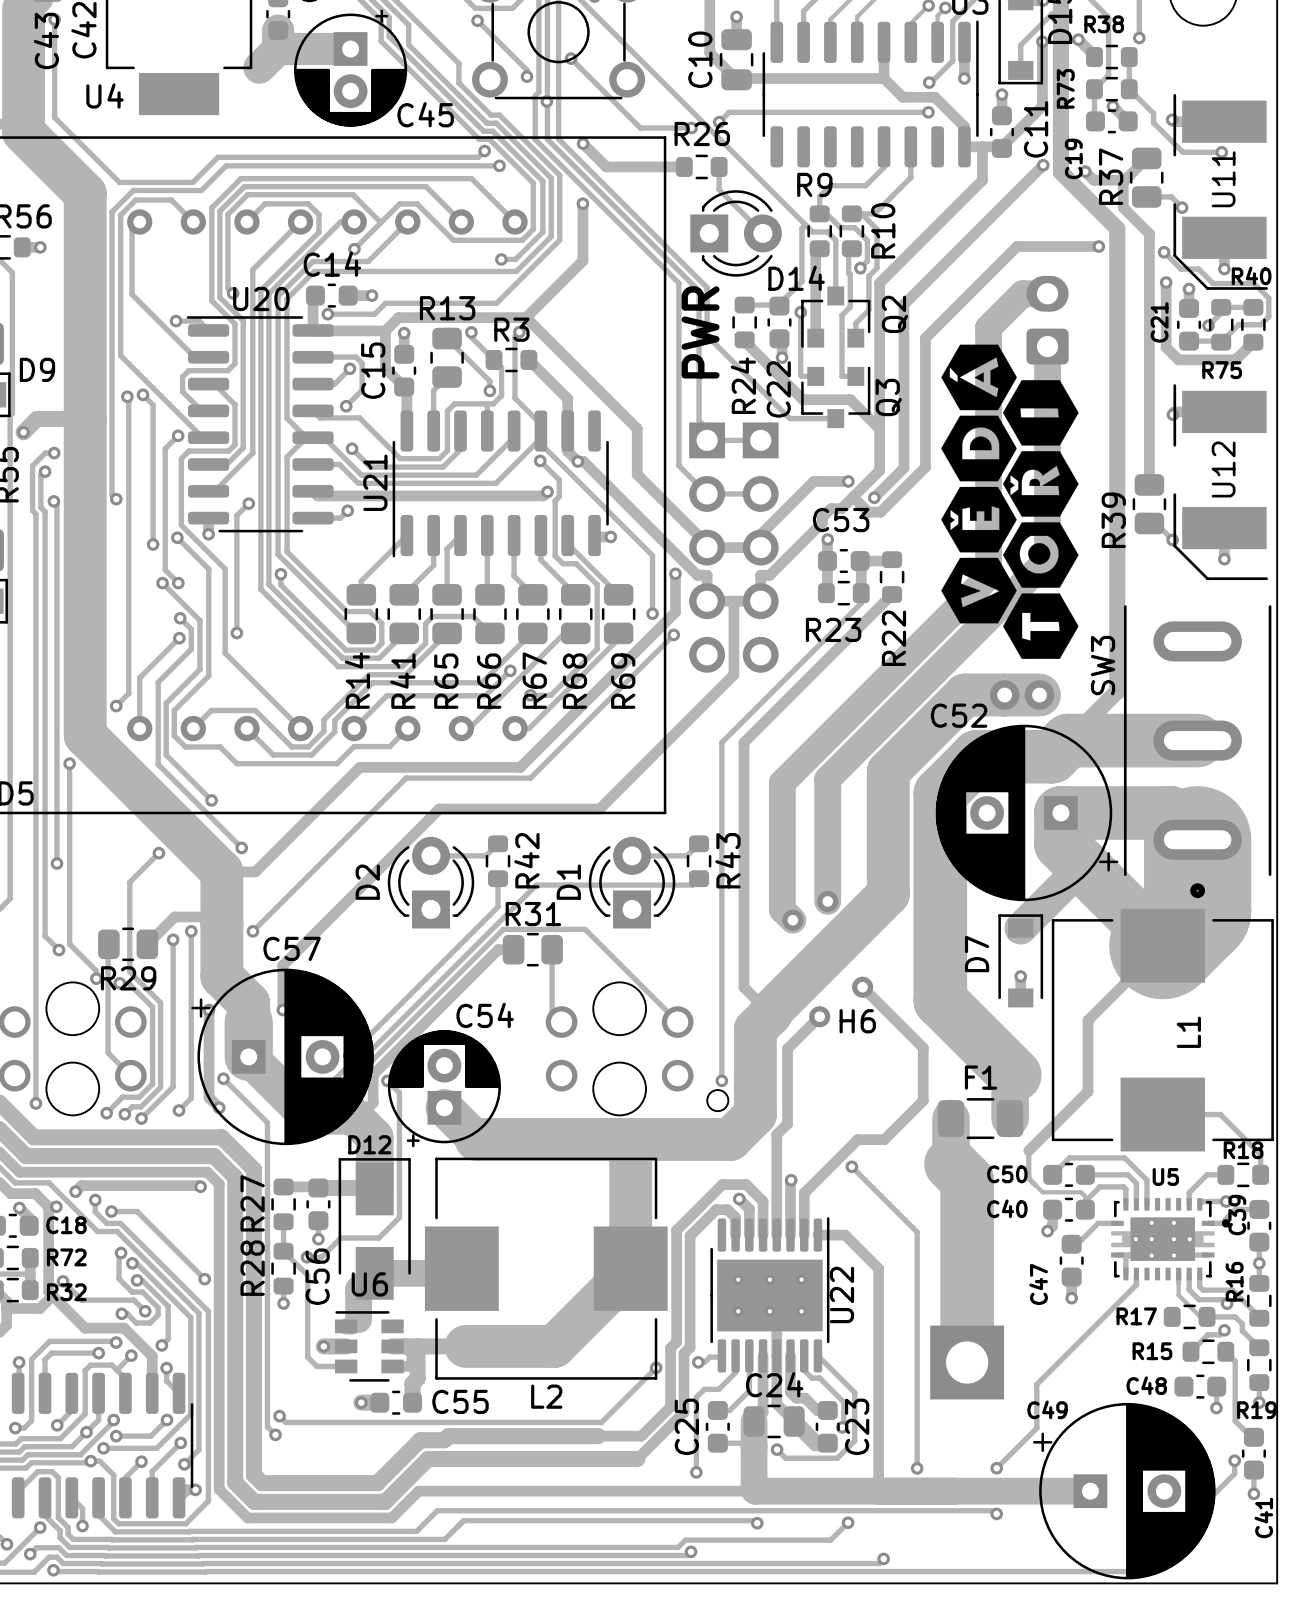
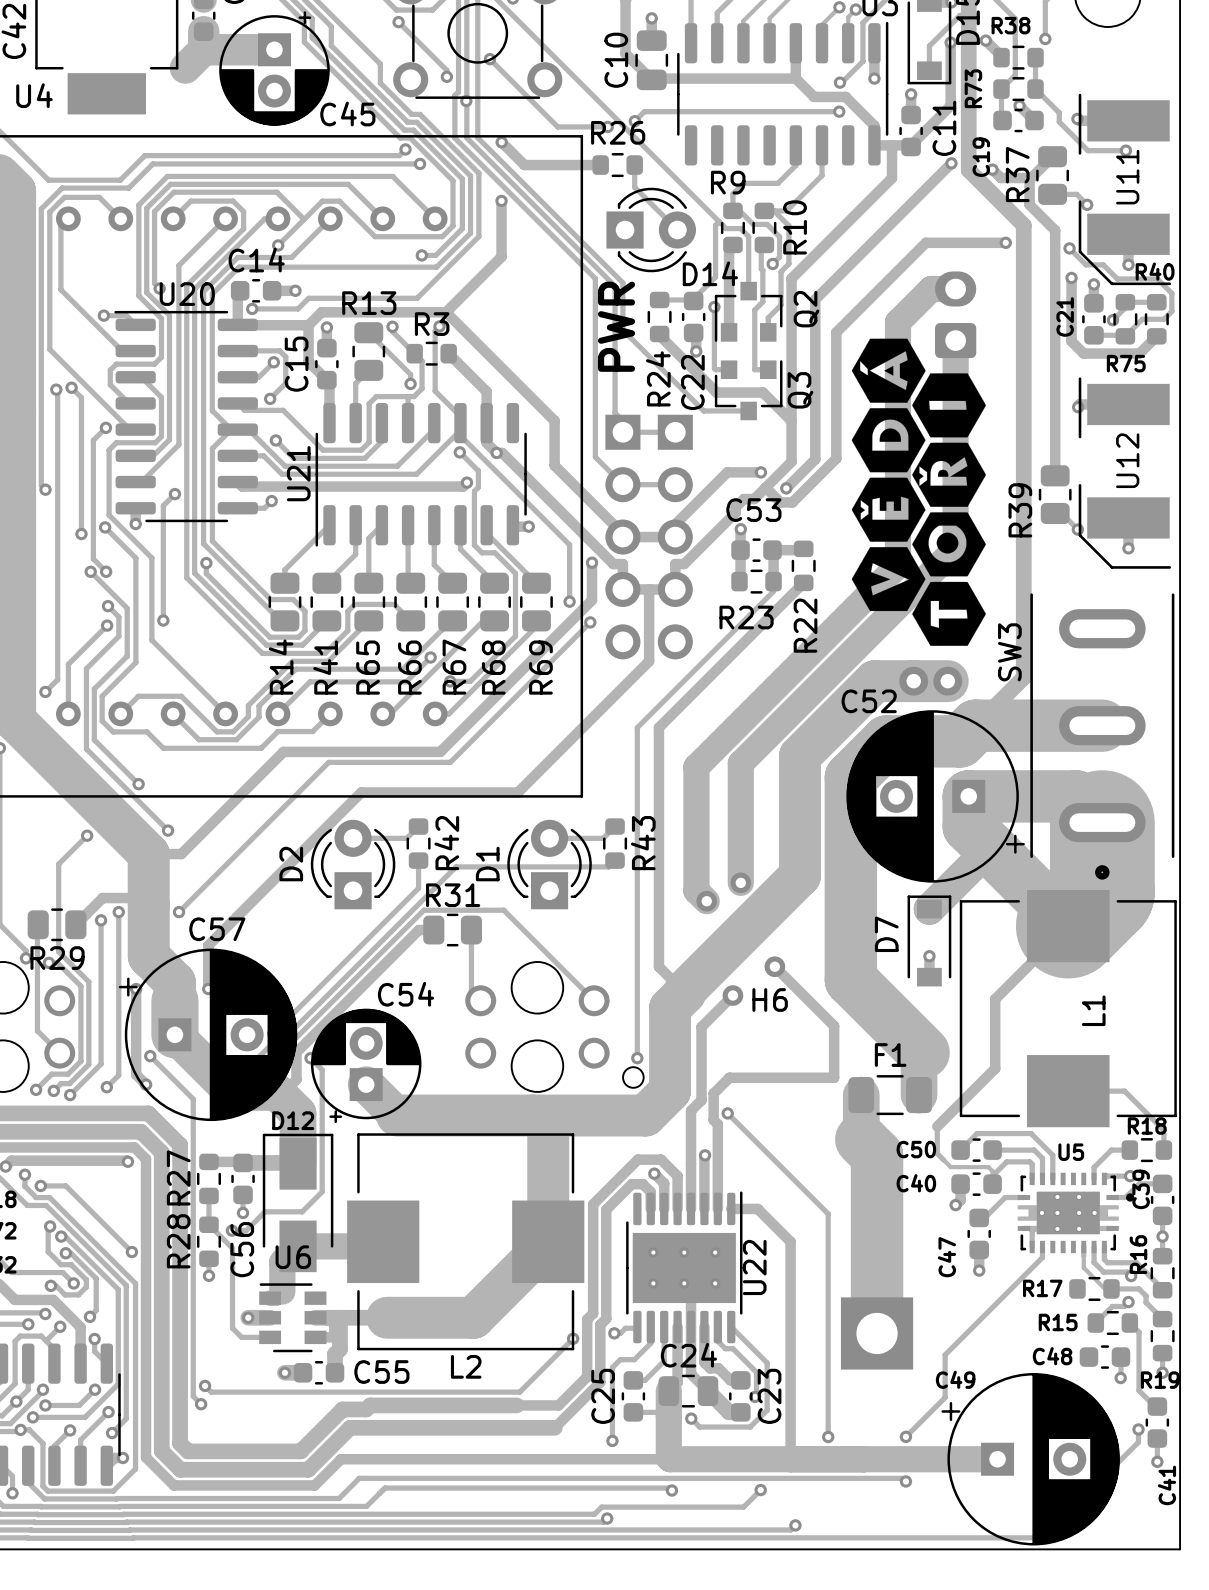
track: (923, 1100) (884, 1139) (857, 1139) (804, 1193) -> (834, 1077) (729, 1077) (713, 1093) (713, 1120) (717, 1124) (717, 1168)
track: (851, 1166) (917, 1232) (917, 1240) -> (727, 1113) (828, 1213)
via position: (851, 1166) -> (727, 1113)

